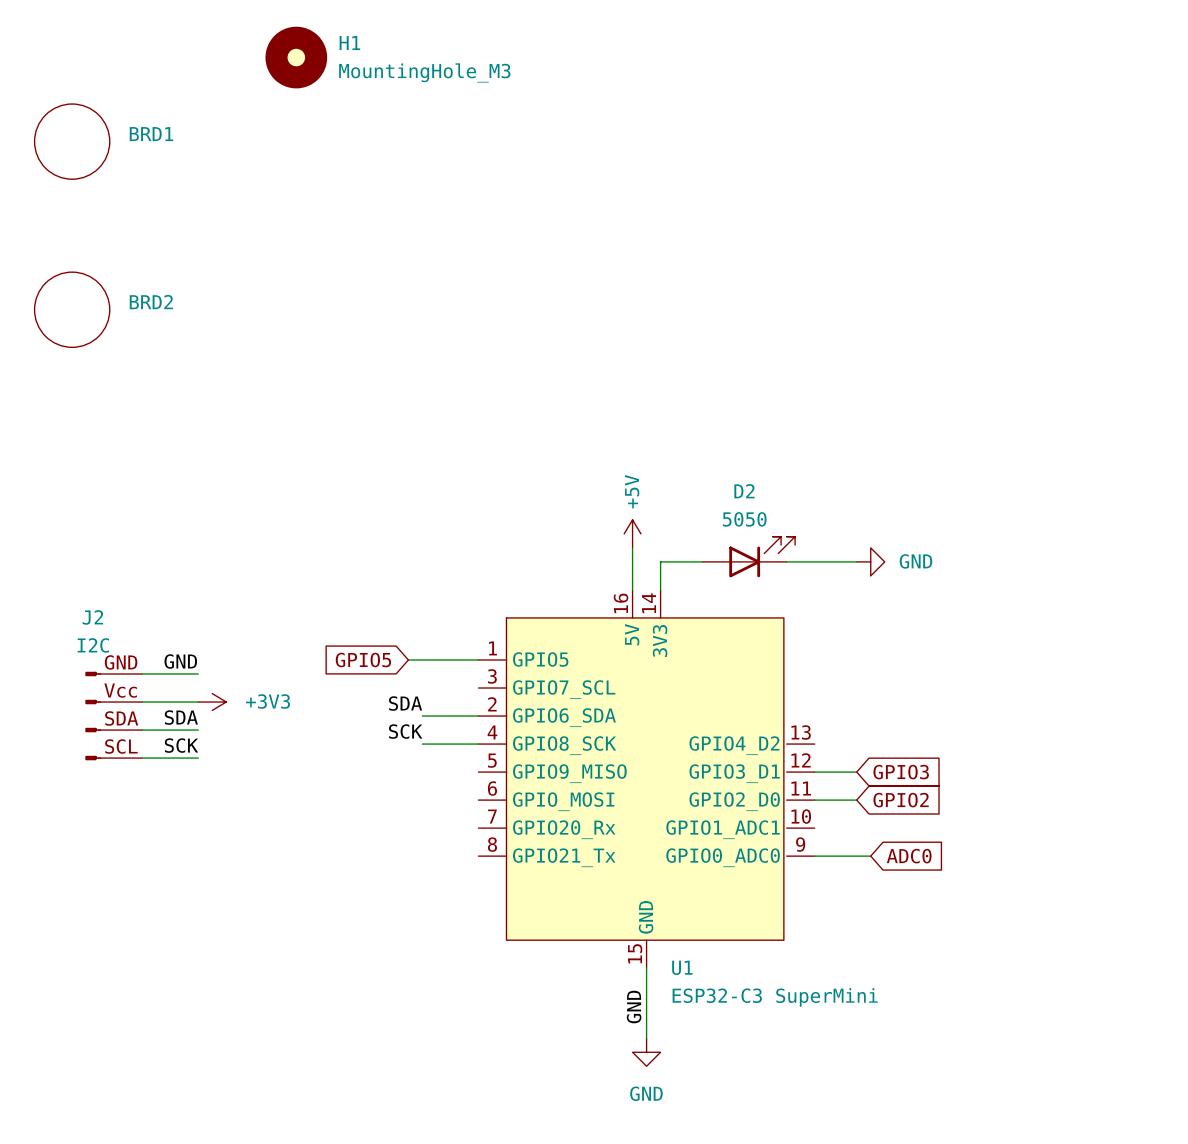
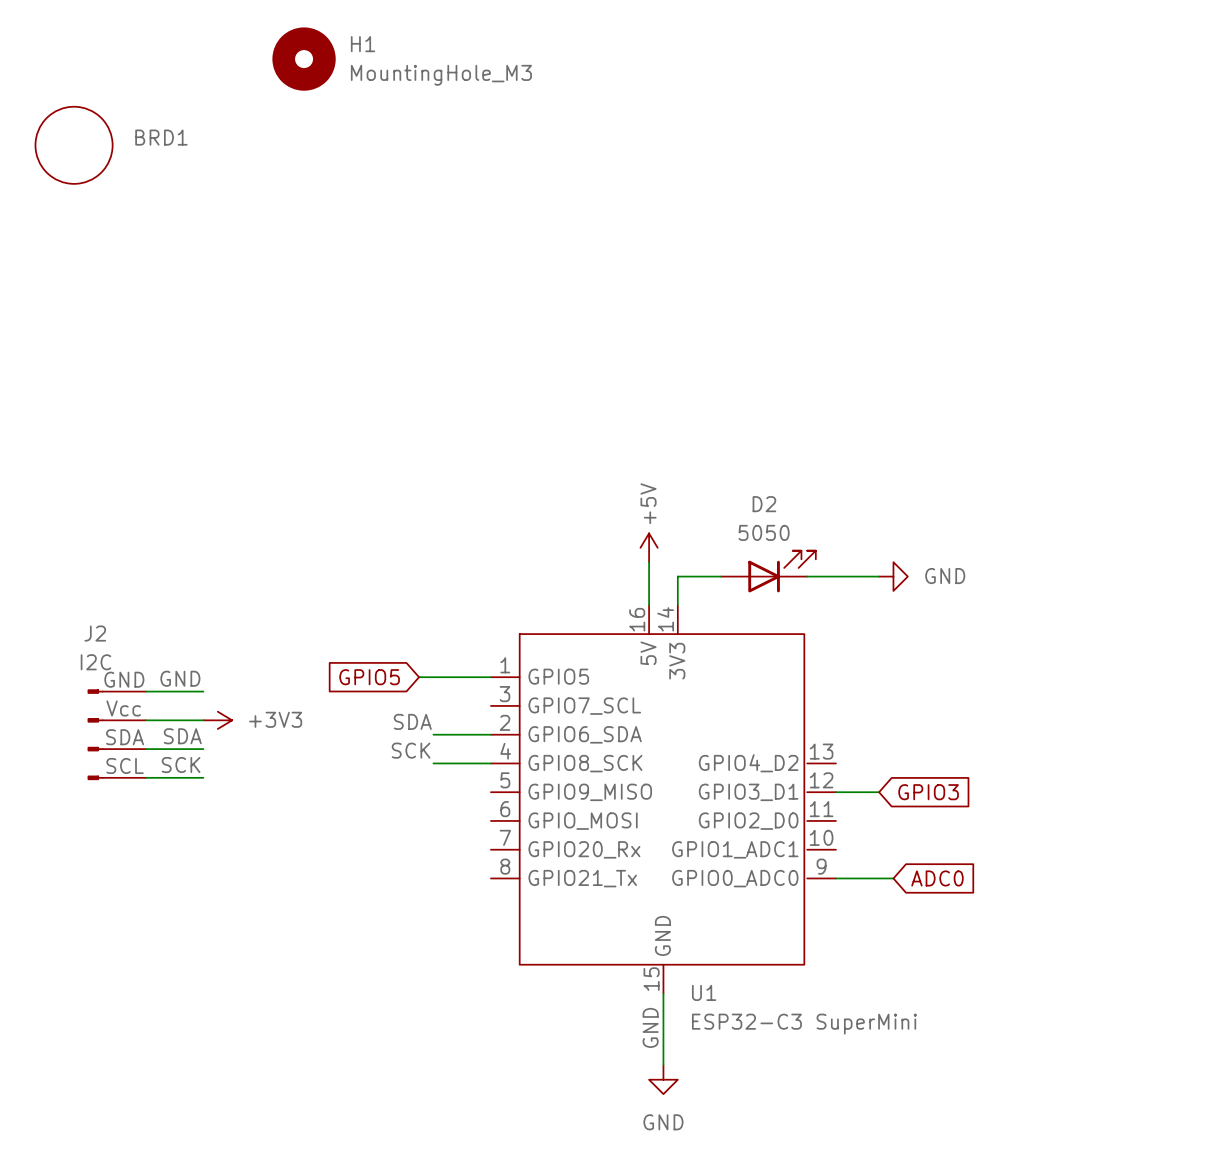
BRD2: (72, 309) -> none
wire: (814, 800) (856, 800) -> none
global label: GPIO2 (901, 800) -> none

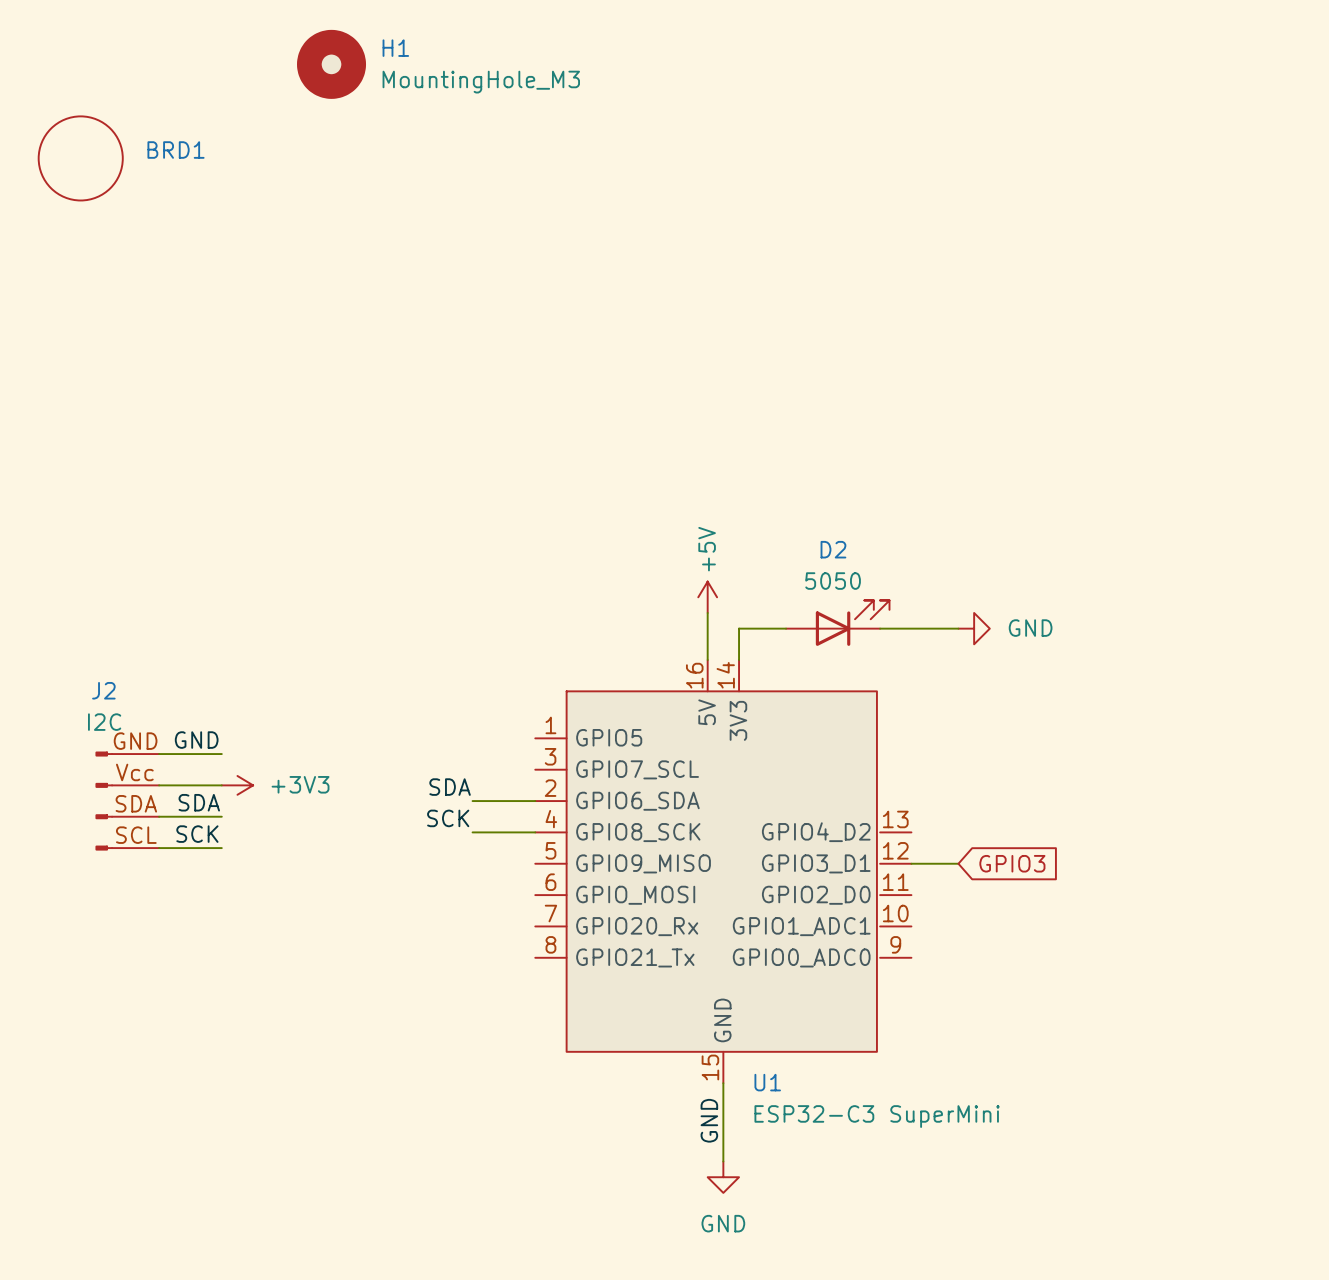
global label: GPIO5 (369, 677) -> none
wire: (419, 677) (490, 677) -> none
wire: (835, 878) (893, 878) -> none
global label: ADC0 (937, 878) -> none

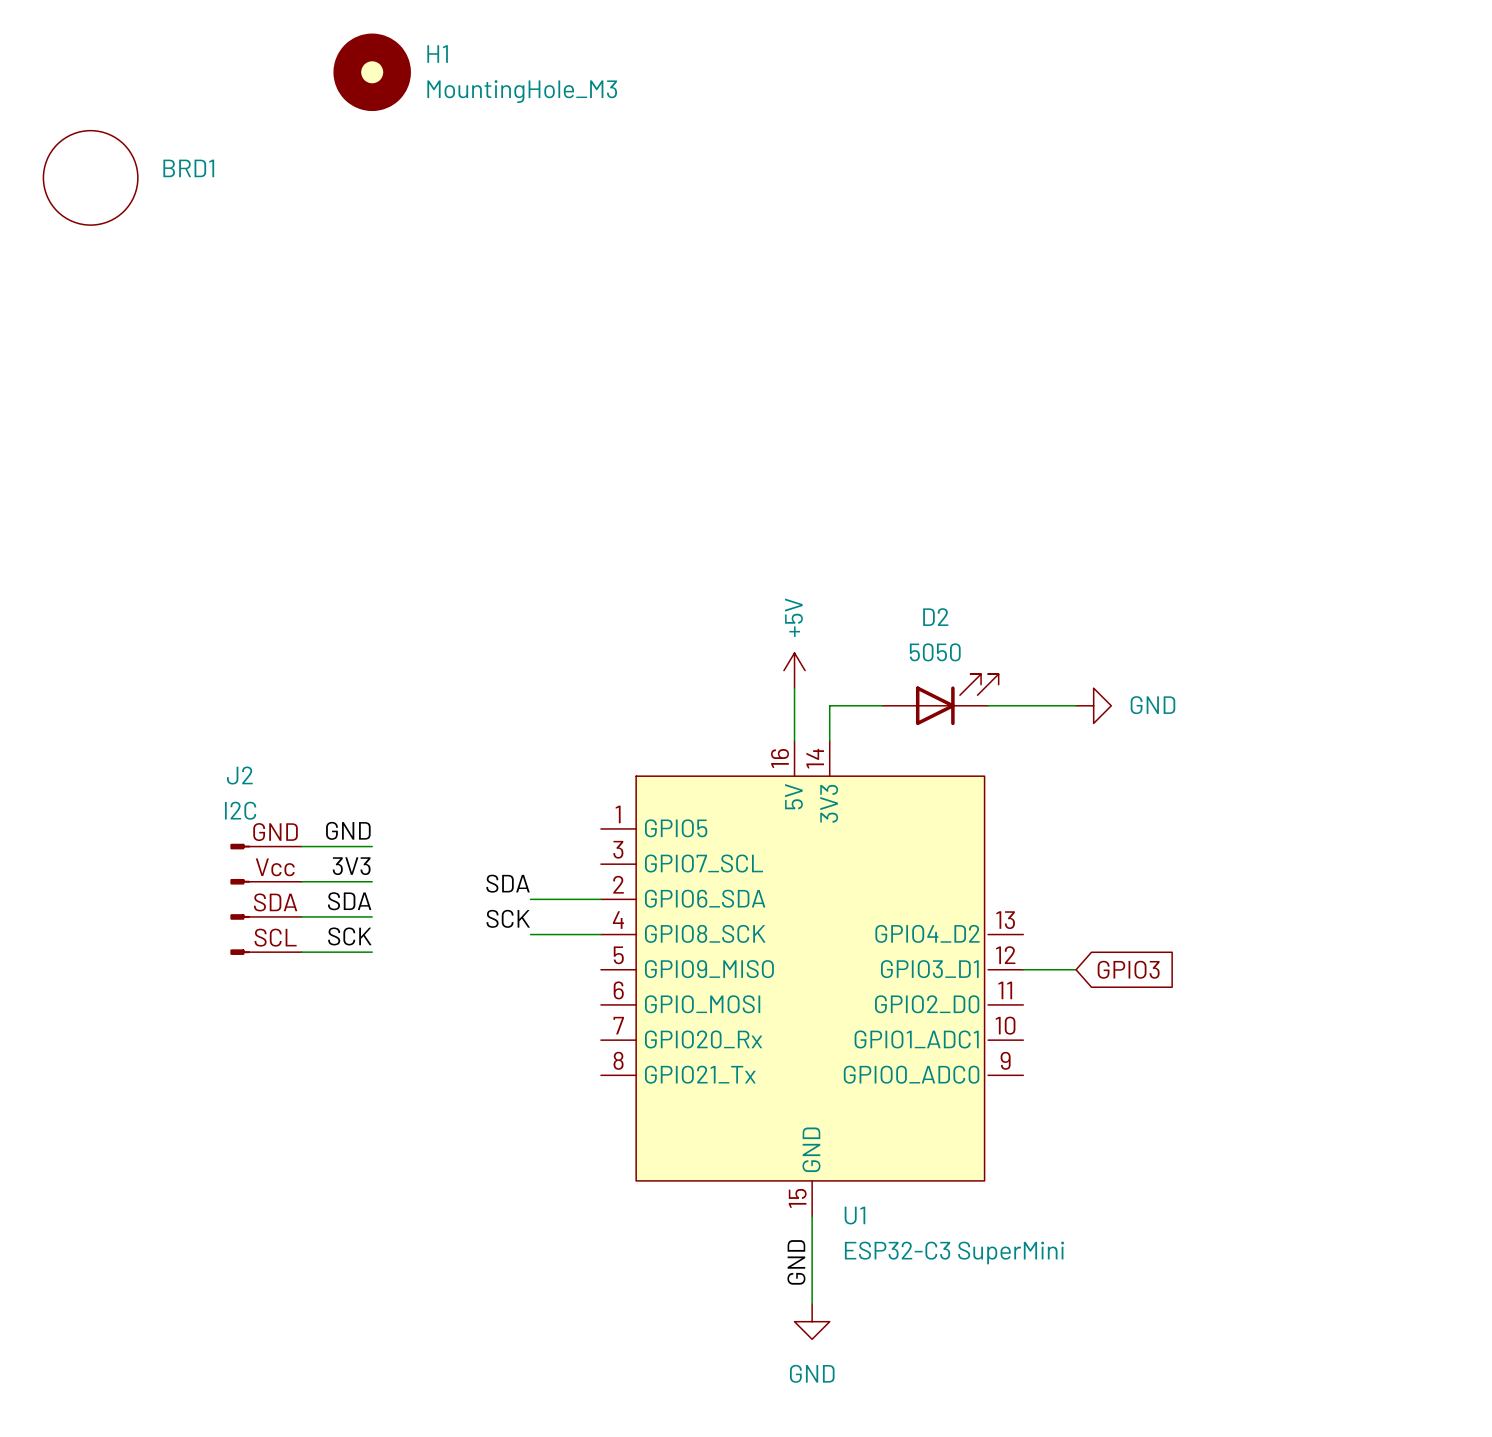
label position: GND (196, 740) -> GND (348, 830)
wire: (159, 754) (221, 754) -> (301, 846) (372, 846)
label: none -> 3V3 (351, 866)
wire: (159, 785) (221, 785) -> (301, 881) (372, 881)
power symbol: +3V3 (237, 785) -> none
J2 position: (127, 801) -> (266, 899)
label position: SDA (199, 802) -> SDA (349, 901)
wire: (159, 816) (221, 816) -> (301, 916) (372, 916)
label position: SCK (197, 834) -> SCK (349, 936)
wire: (159, 848) (221, 848) -> (301, 952) (372, 952)

